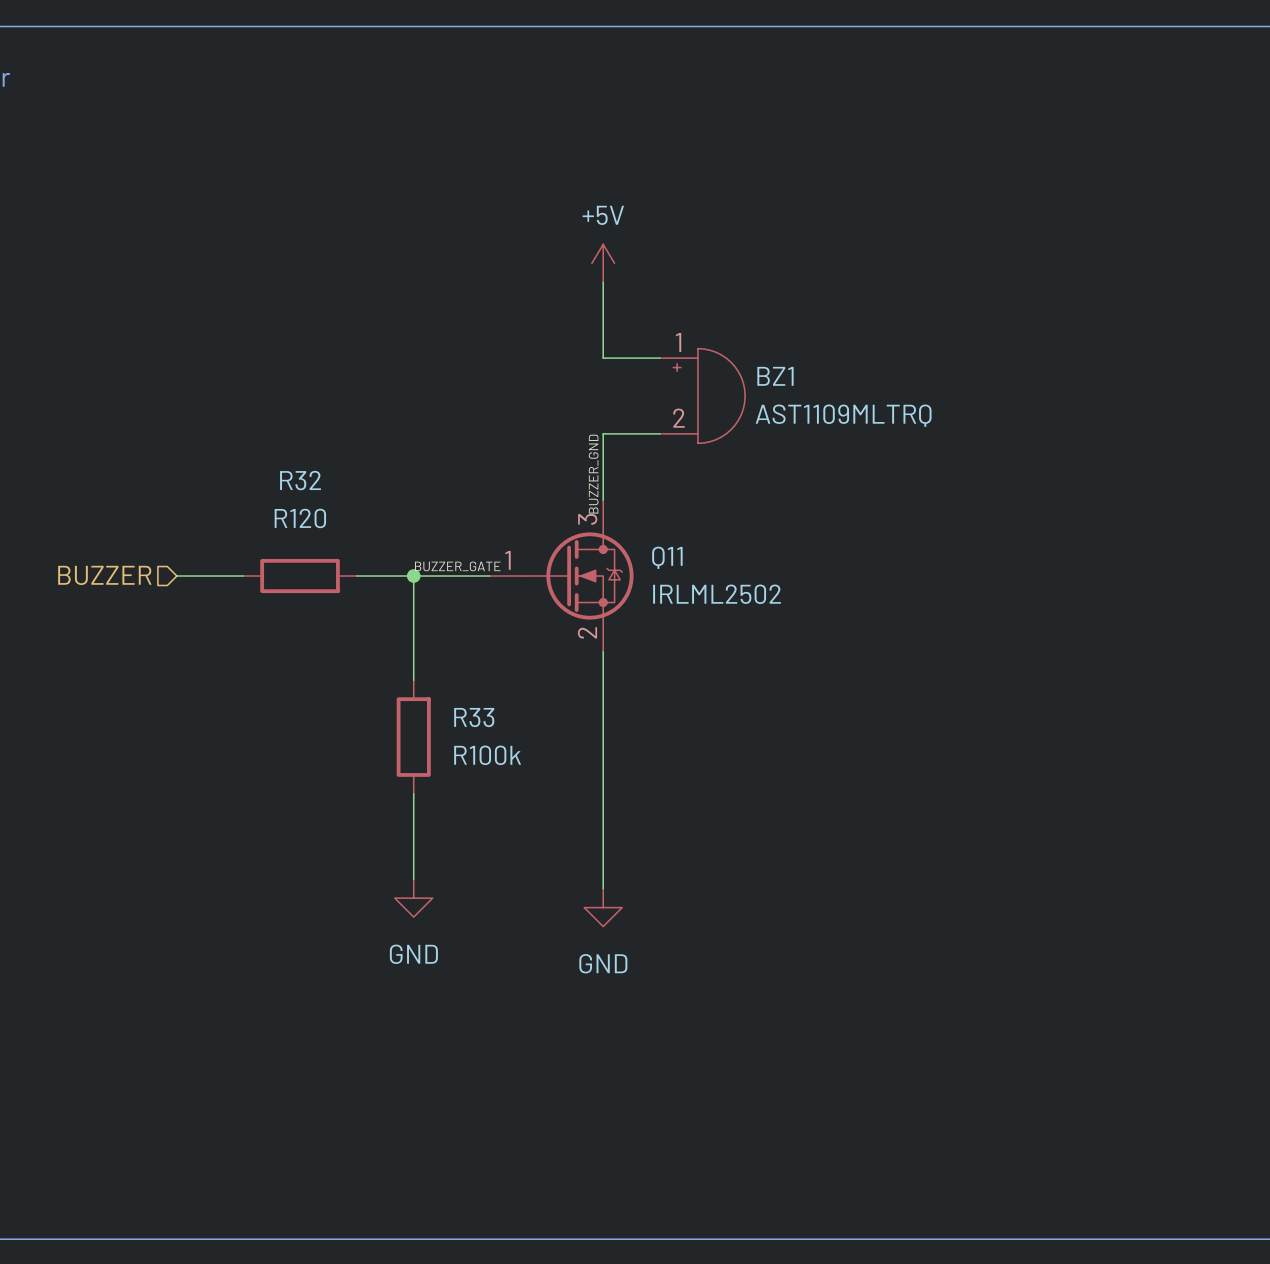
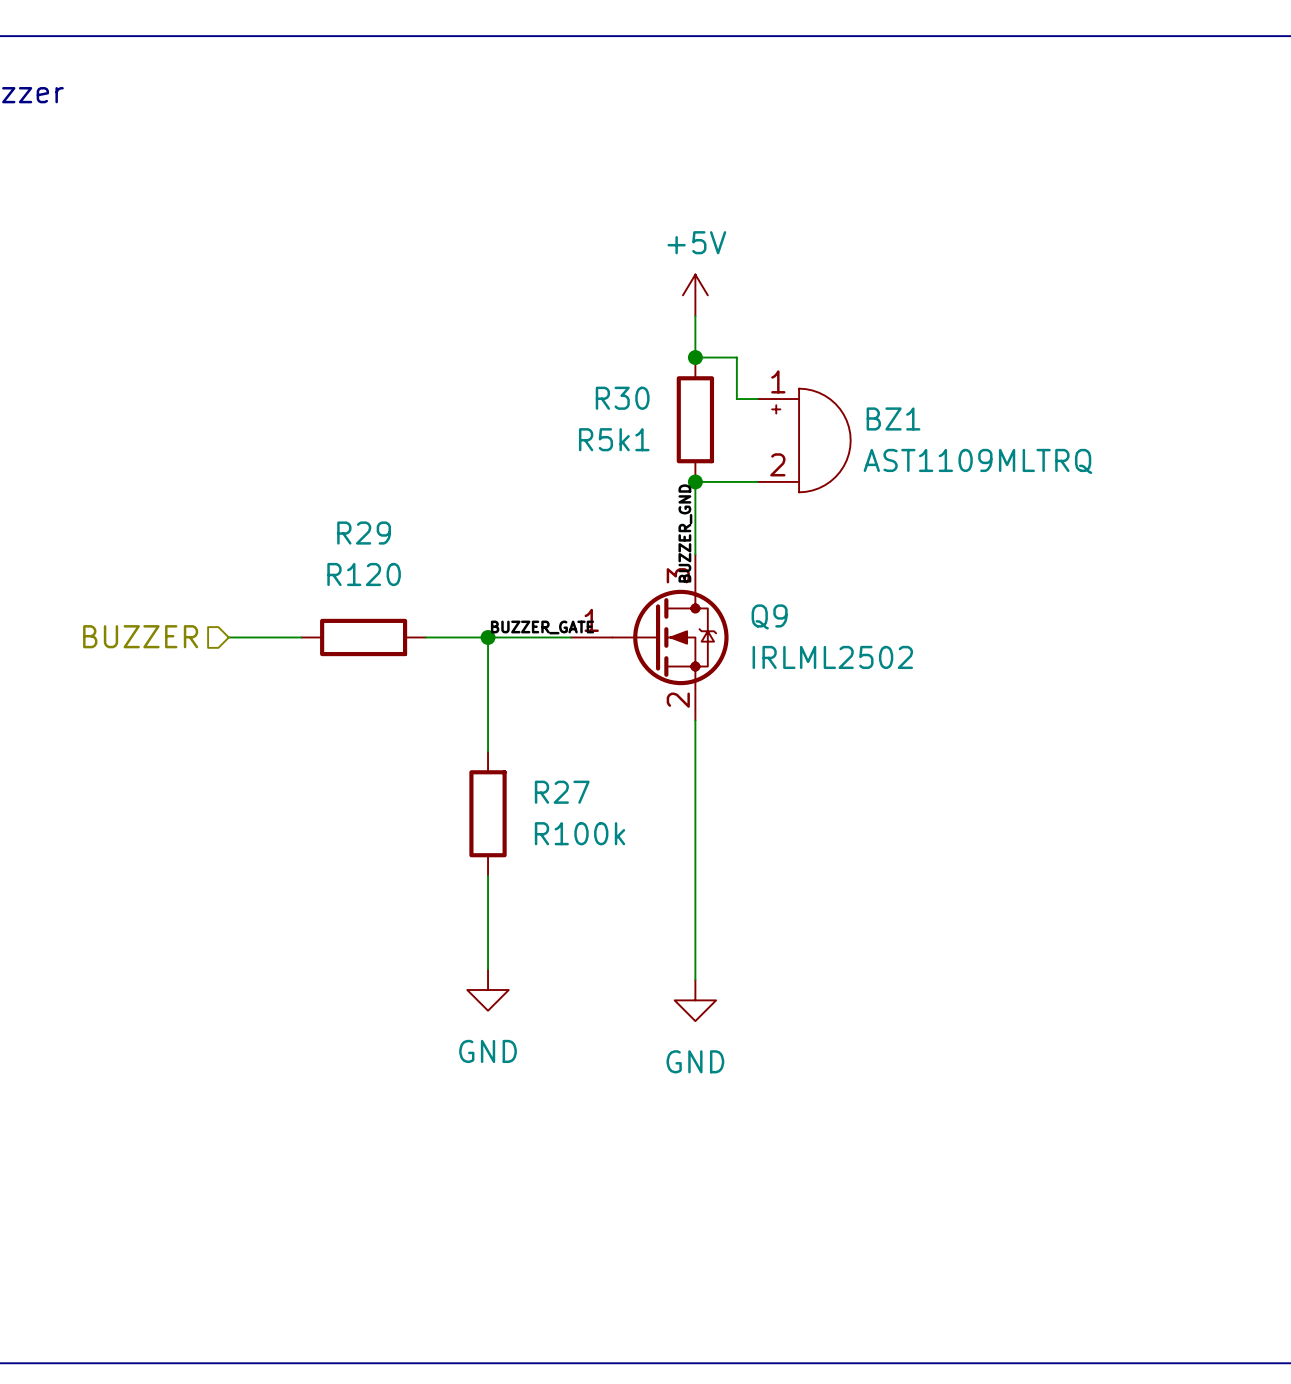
wire: (603, 320) (603, 358) (641, 358) -> (695, 357) (736, 357) (736, 399)
junction: none -> (695, 357)
R30: none -> R5k1 (695, 419)
junction: none -> (695, 481)
R32 name: R32 (300, 480) -> R29 (364, 533)
Q11 name: Q11 (667, 557) -> Q9 (769, 616)
R33 name: R33 (474, 717) -> R27 (562, 792)

